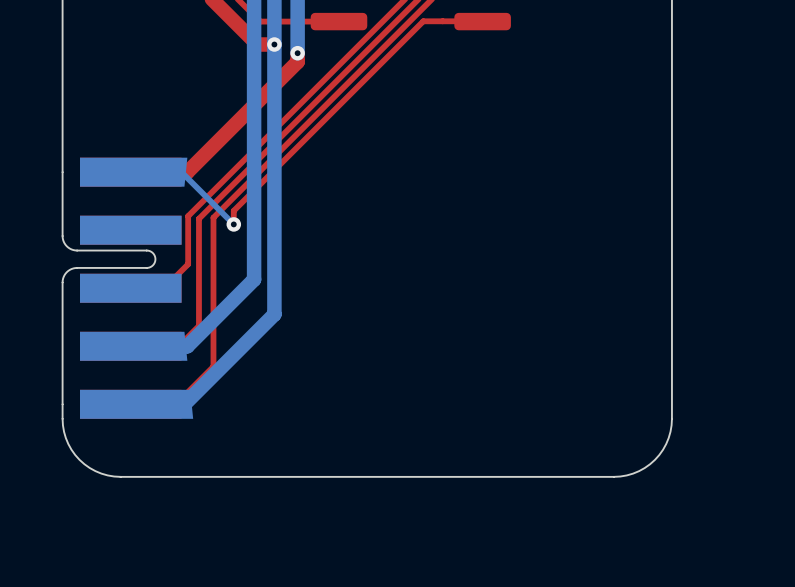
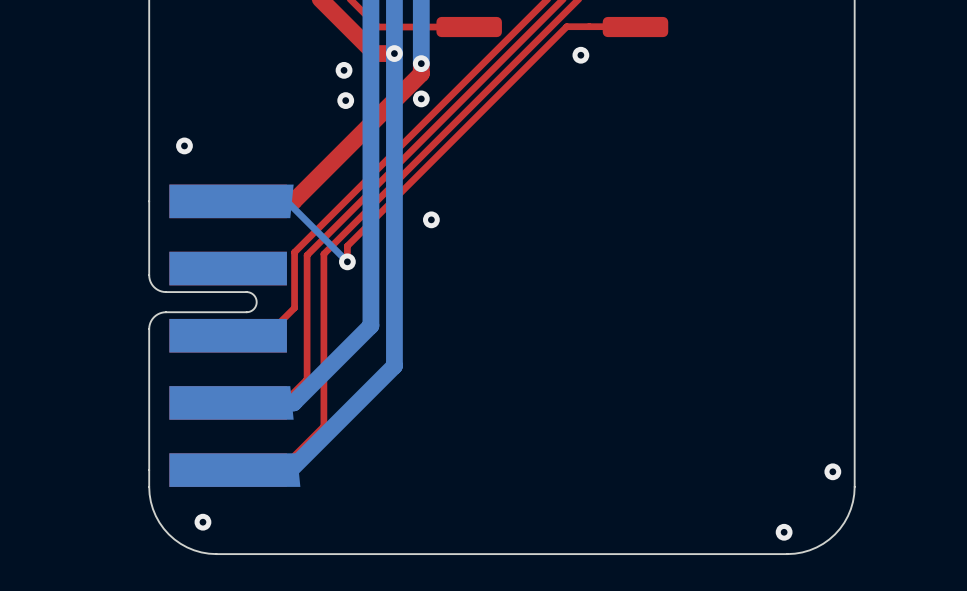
via: none -> (580, 55)
via: none -> (344, 70)
via: none -> (421, 98)
via: none -> (345, 100)
via: none -> (184, 145)
via: none -> (431, 219)
via: none -> (832, 471)
via: none -> (202, 522)
via: none -> (784, 532)

